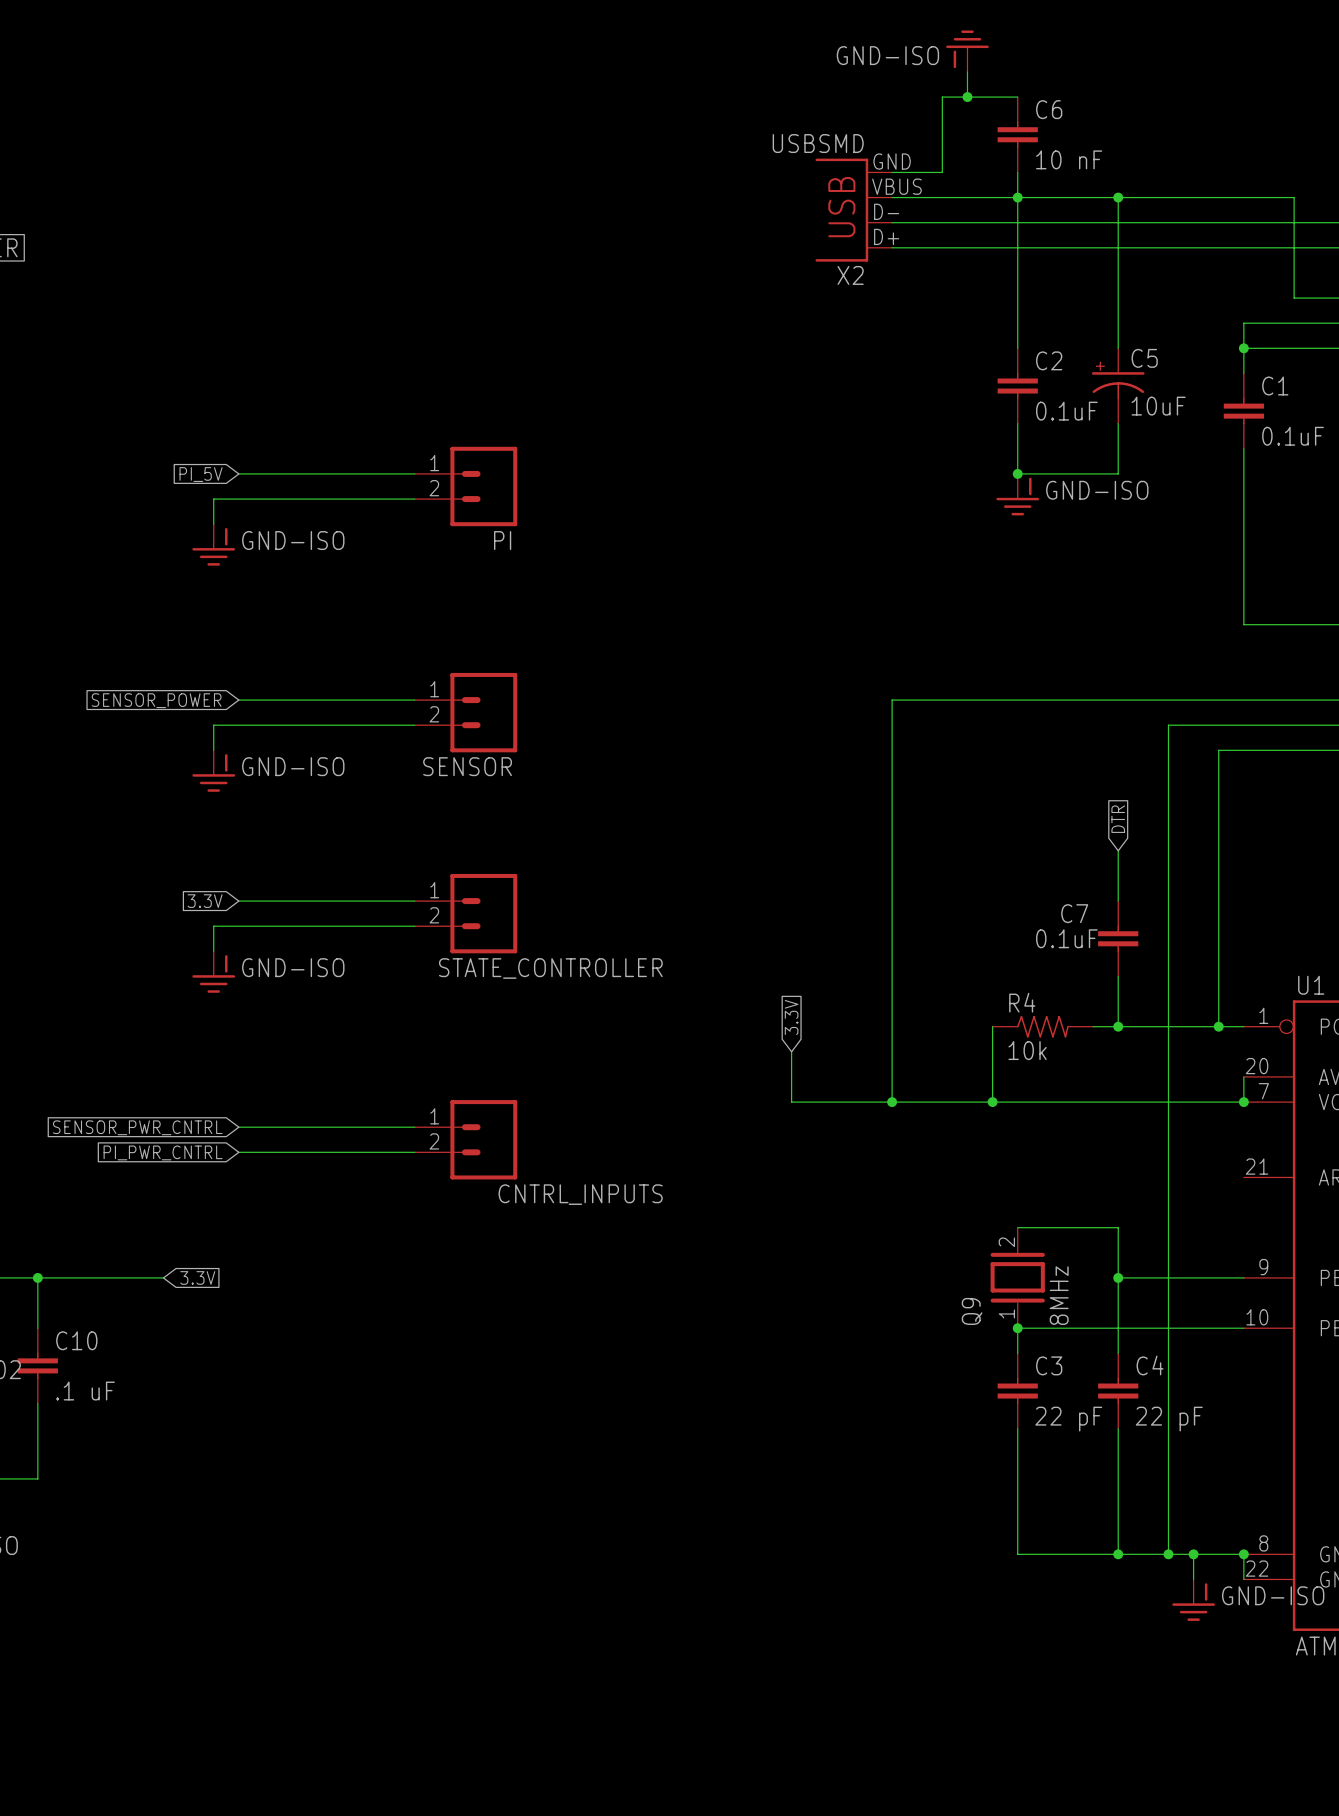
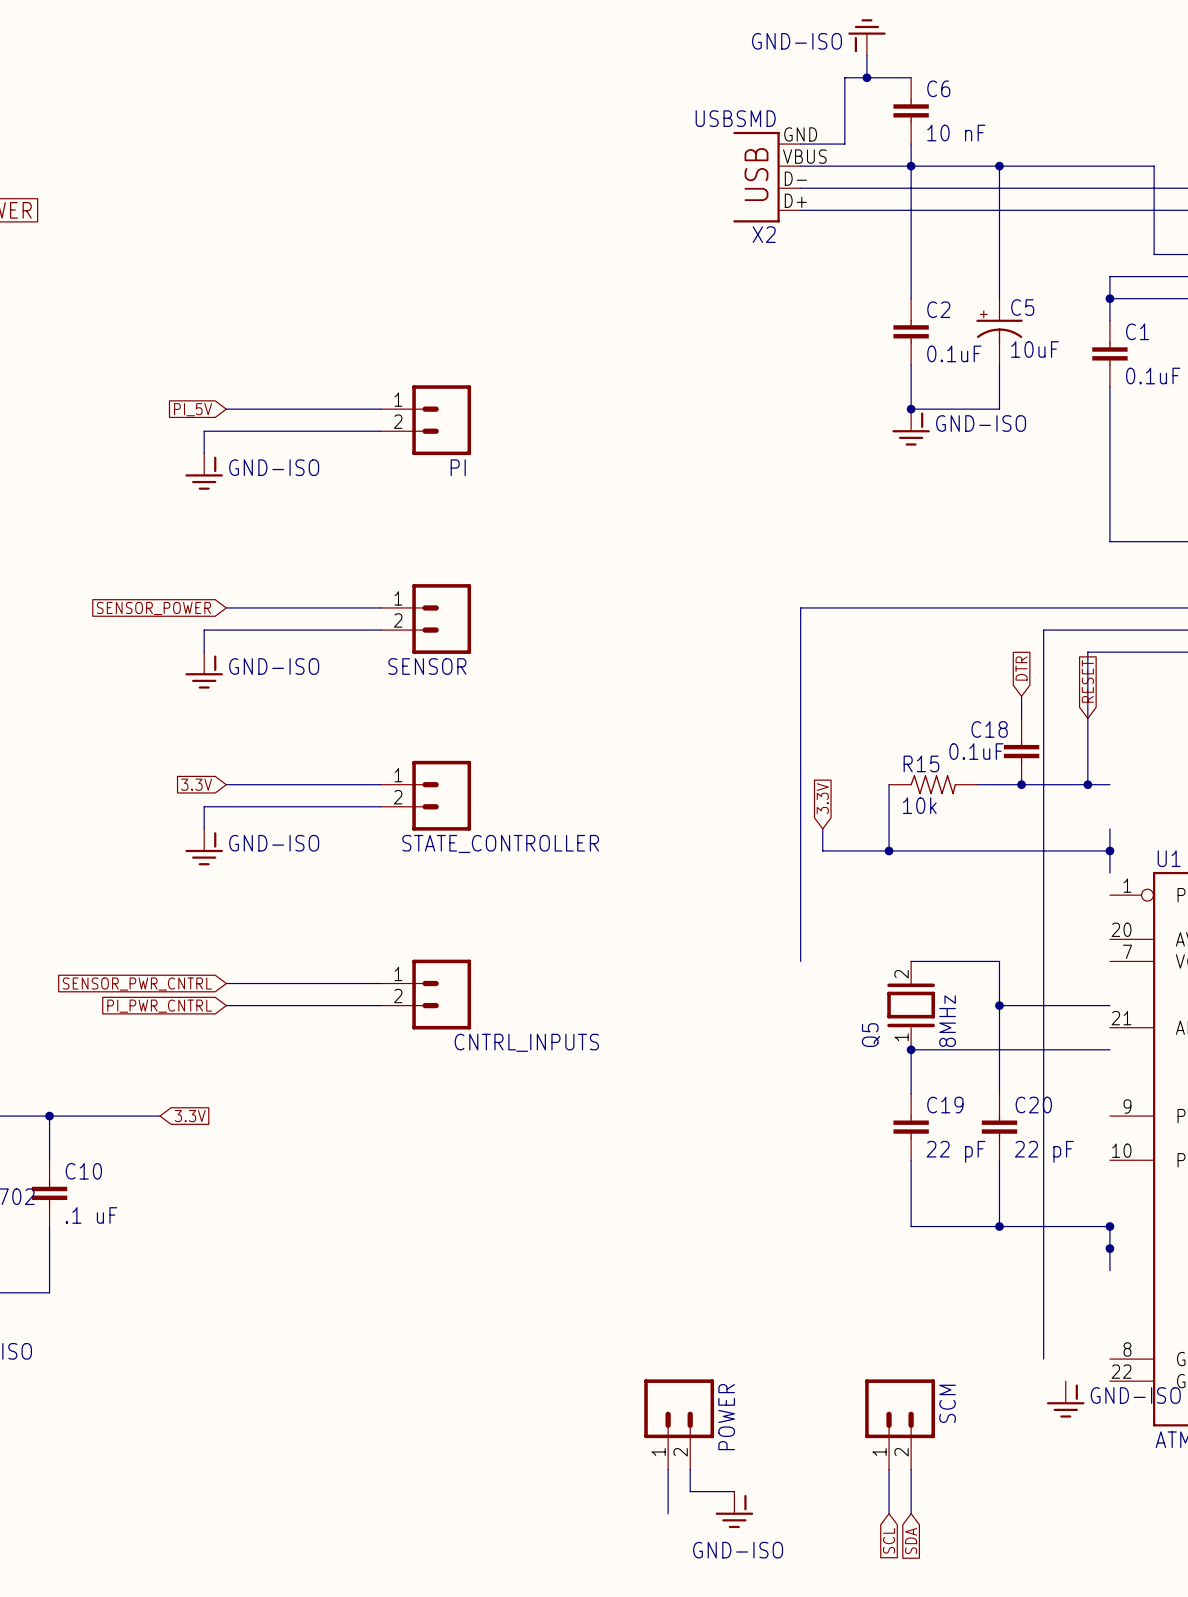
global label: none -> RESET (1087, 681)
wire: none -> (1021, 696) (1021, 718)
global label position: DTR (1118, 819) -> DTR (1021, 668)
wire: (1118, 850) (1118, 901) -> none
C18: none -> 0.1uF (1021, 751)
R15: none -> 10k (933, 784)
junction: none -> (1021, 784)
wire: (1218, 901) (1218, 1026) -> none
junction: none -> (1087, 784)
C7: 0.1uF (1118, 938) -> none
wire: none -> (822, 828) (822, 850) (1109, 850)
junction: none -> (889, 850)
wire: (1118, 976) (1118, 1026) -> (1109, 828) (1109, 873)
global label position: 3.3V (791, 1017) -> 3.3V (822, 798)
wire: (992, 1026) (992, 1102) -> (889, 784) (889, 850)
R4: 10k (1042, 1026) -> none
wire: (1093, 1026) (1243, 1026) -> (977, 784) (1109, 784)
junction: (1118, 1026) -> none
junction position: (1218, 1026) -> (1109, 850)
wire: (791, 1051) (791, 1102) (1017, 1102) -> none
wire: (1243, 1076) (1243, 1102) (1118, 1102) -> none
junction: (892, 1102) -> none
junction: (992, 1102) -> none
junction: (1243, 1102) -> none
Q5: none -> 8MHz (911, 1005)
junction: none -> (999, 1005)
junction: none -> (911, 1049)
wire: none -> (1109, 1049) (911, 1049) (911, 1093)
wire: (1017, 1227) (1118, 1227) -> (999, 961) (999, 1071)
Q9: 8MHz (1017, 1277) -> none
wire: (1118, 1277) (1243, 1277) -> (999, 1005) (1109, 1005)
junction: (1118, 1277) -> none
C19: none -> 22 pF (911, 1127)
C20: none -> 22 pF (999, 1127)
wire: (1017, 1328) (1243, 1328) -> none
junction: (1017, 1328) -> none
wire: none -> (911, 1182) (911, 1226) (1109, 1226) (1109, 1270)
C3: 22 pF (1017, 1391) -> none
C4: 22 pF (1118, 1391) -> none
junction: none -> (999, 1226)
junction: none -> (1109, 1226)
wire: (1017, 1428) (1017, 1554) (1243, 1554) (1243, 1579) -> none
wire: (1118, 1428) (1118, 1554) -> none
junction: none -> (1109, 1248)
junction: (1118, 1554) -> none
junction: (1168, 1554) -> none
wire: (1193, 1554) (1193, 1579) -> none
junction: (1193, 1554) -> none
junction: (1243, 1554) -> none
POWER: none -> (679, 1424)
SCM: none -> (900, 1424)
wire: none -> (668, 1469) (668, 1513)
wire: none -> (690, 1469) (690, 1491) (734, 1491)
wire: none -> (889, 1469) (889, 1513)
wire: none -> (911, 1469) (911, 1513)
power symbol: none -> GND-ISO (734, 1509)
global label: none -> SCL (889, 1540)
global label: none -> SDA (911, 1541)

